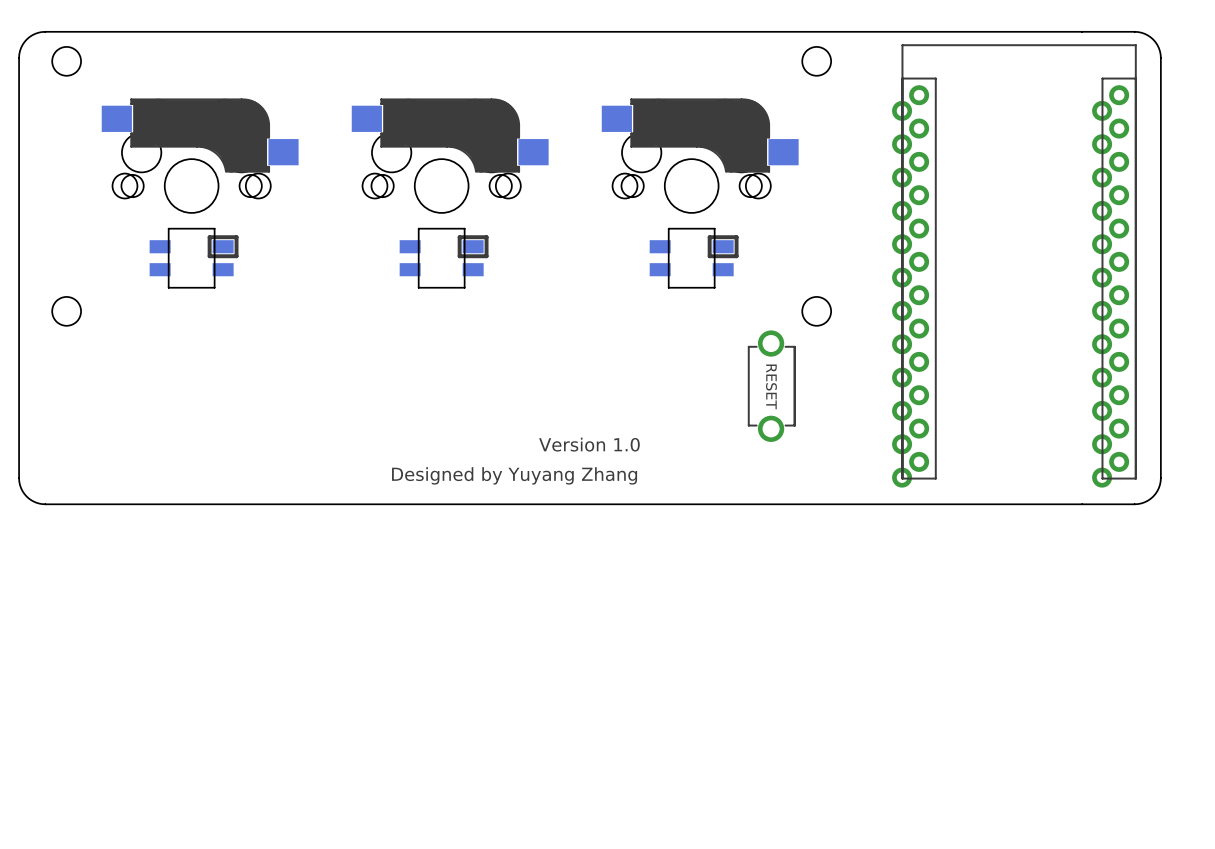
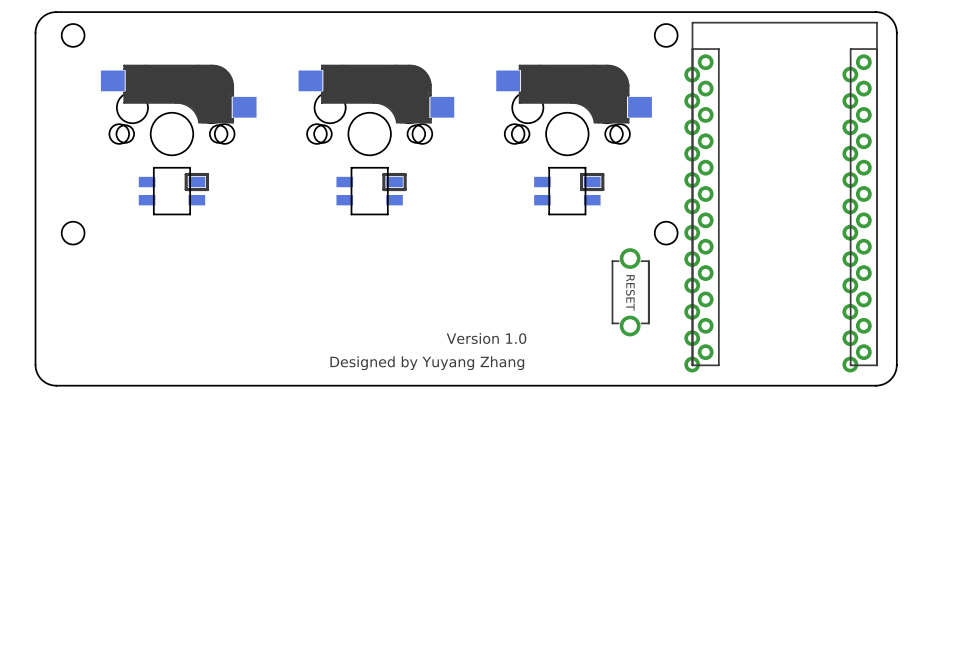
board edge: (1082, 31) (1141, 32) (1155, 42) (1160, 58) (1160, 481) (1153, 496) (1141, 503) (1082, 504) -> (876, 12) (884, 13) (890, 18) (895, 24) (896, 32) (896, 364) (895, 372) (890, 379) (884, 384) (876, 385)
part position: (1014, 265) -> (781, 197)

